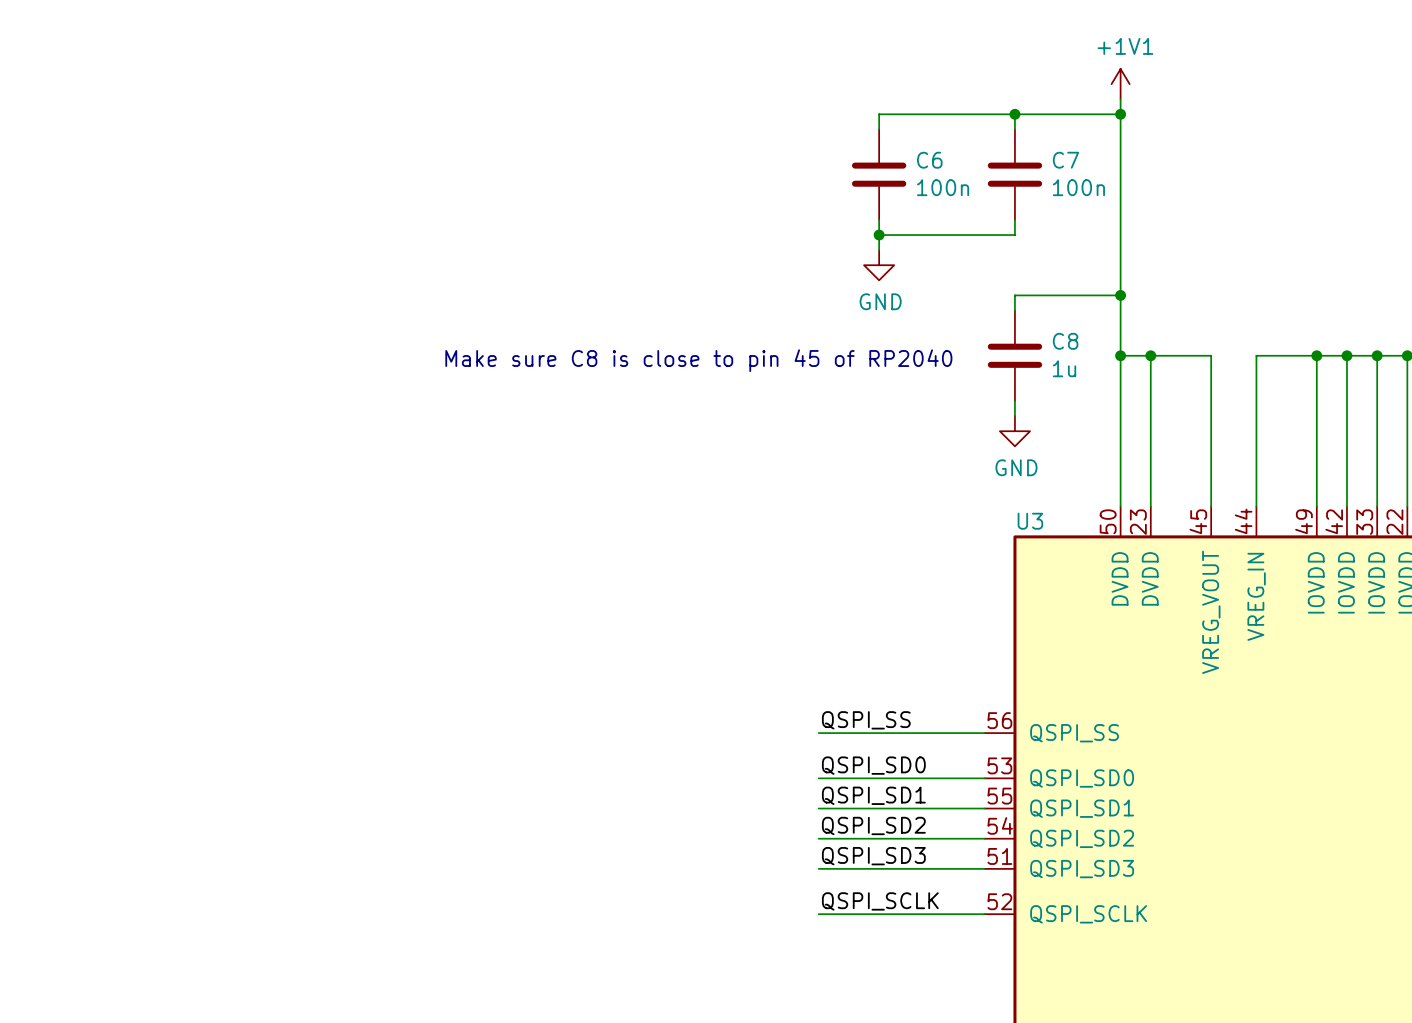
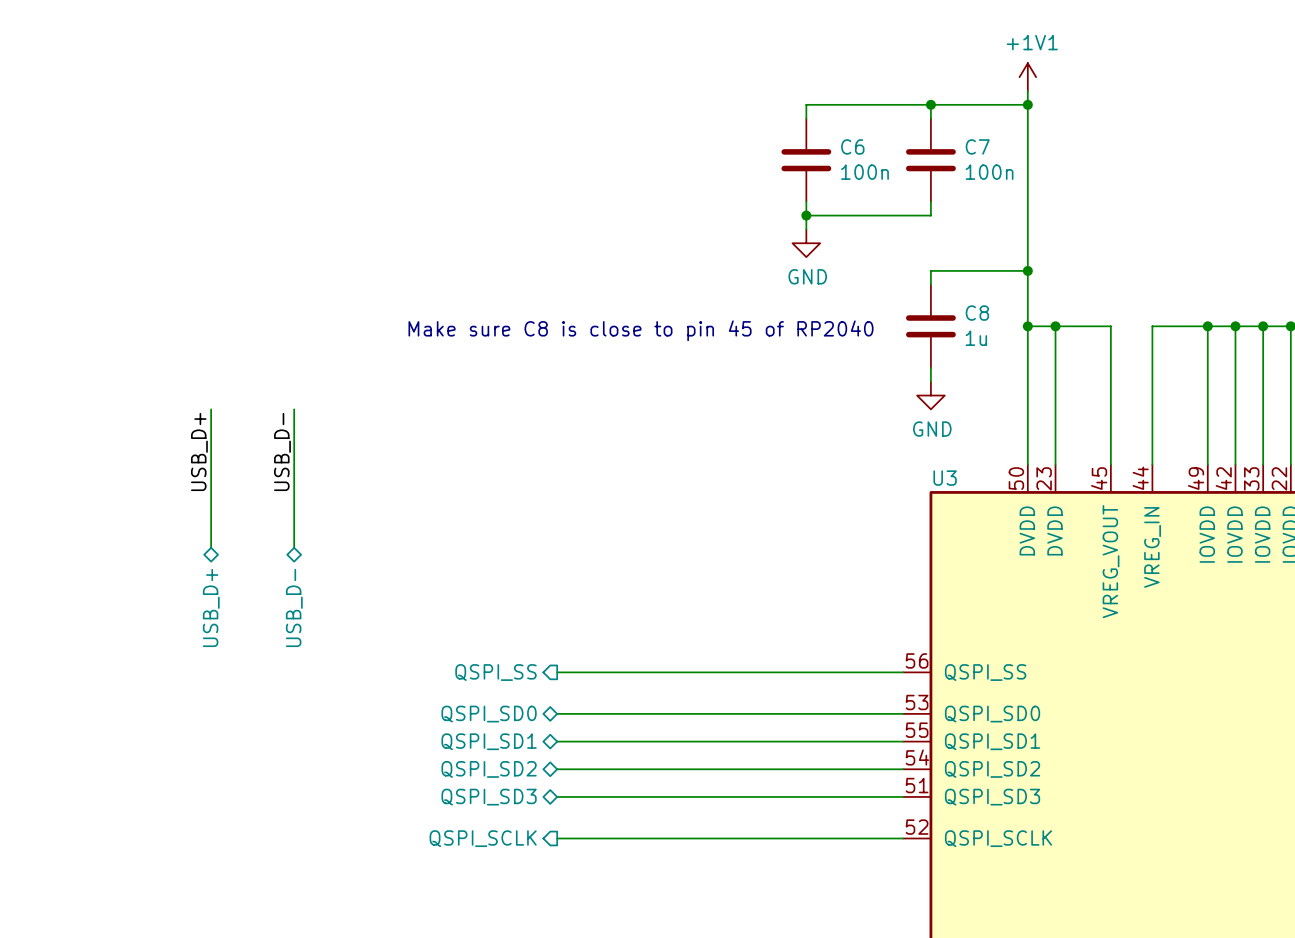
wire: none -> (211, 409) (211, 547)
wire: none -> (294, 409) (294, 547)
label: none -> USB_D+ (199, 451)
label: none -> USB_D- (282, 451)
sheet pin: none -> USB_D+ (211, 608)
sheet pin: none -> USB_D- (294, 608)
label: QSPI_SS (866, 720) -> none
sheet pin: none -> QSPI_SS (495, 672)
wire: none -> (557, 672) (750, 672)
label: QSPI_SD0 (873, 765) -> none
sheet pin: none -> QSPI_SD0 (489, 714)
wire: none -> (557, 713) (750, 713)
label: QSPI_SD1 (873, 795) -> none
sheet pin: none -> QSPI_SD1 (489, 741)
wire: none -> (557, 741) (750, 741)
label: QSPI_SD2 (873, 825) -> none
sheet pin: none -> QSPI_SD2 (489, 769)
wire: none -> (557, 769) (750, 769)
label: QSPI_SD3 (873, 856) -> none
wire: none -> (557, 796) (750, 796)
sheet pin: none -> QSPI_SD3 (489, 797)
label: QSPI_SCLK (880, 901) -> none
sheet pin: none -> QSPI_SCLK (483, 838)
wire: none -> (557, 838) (750, 838)

